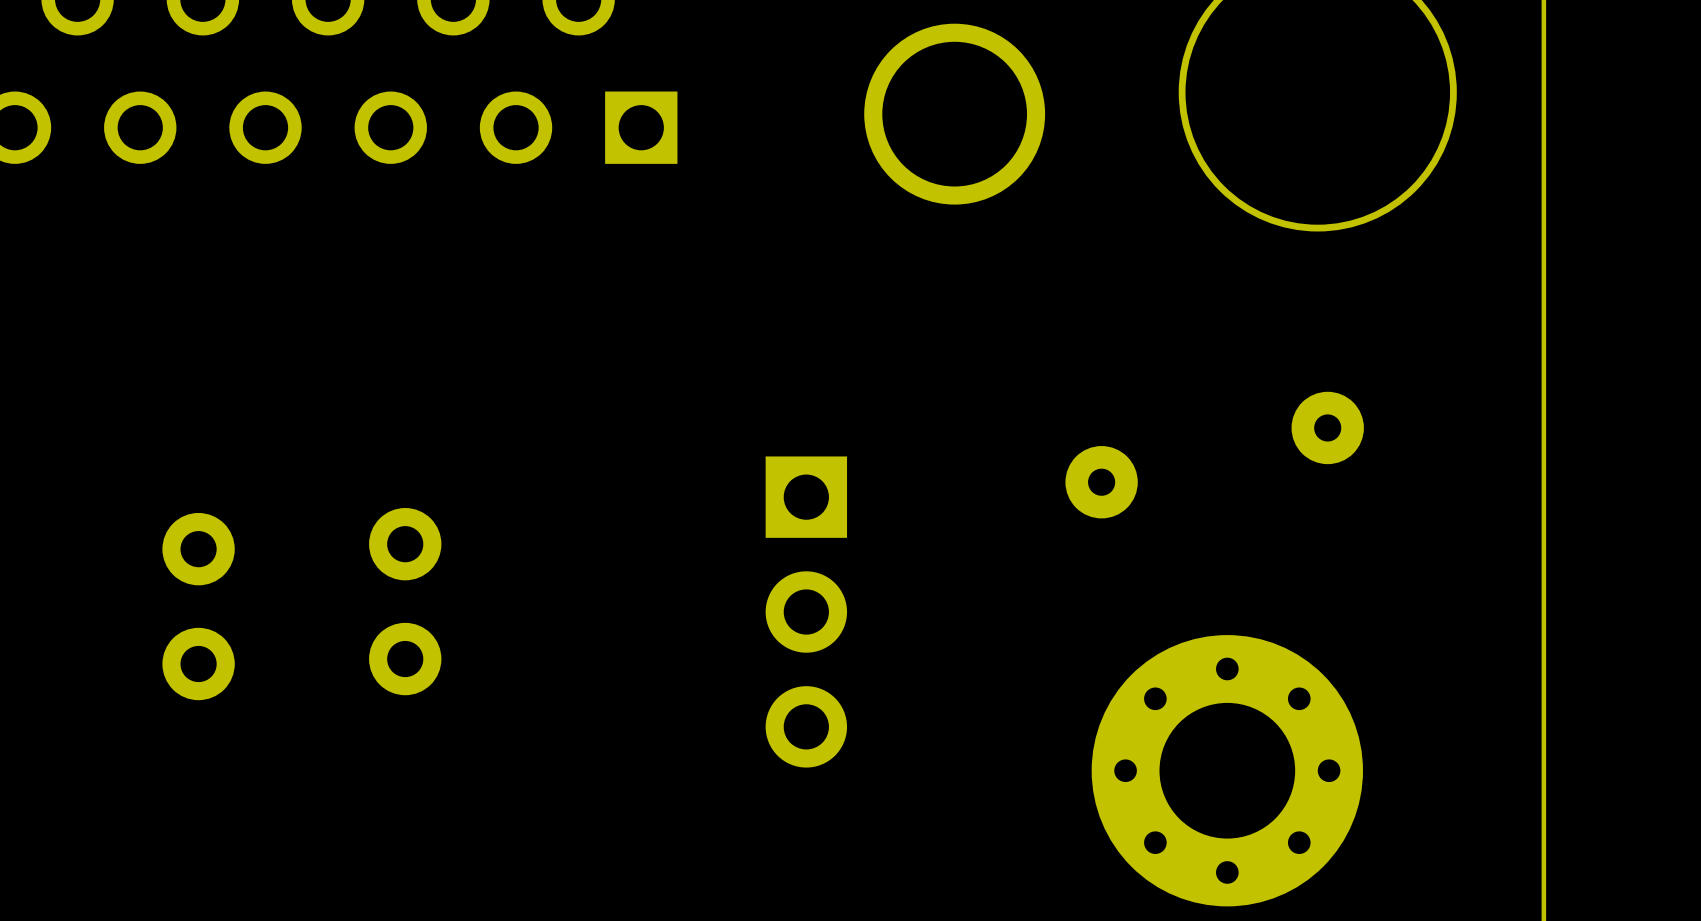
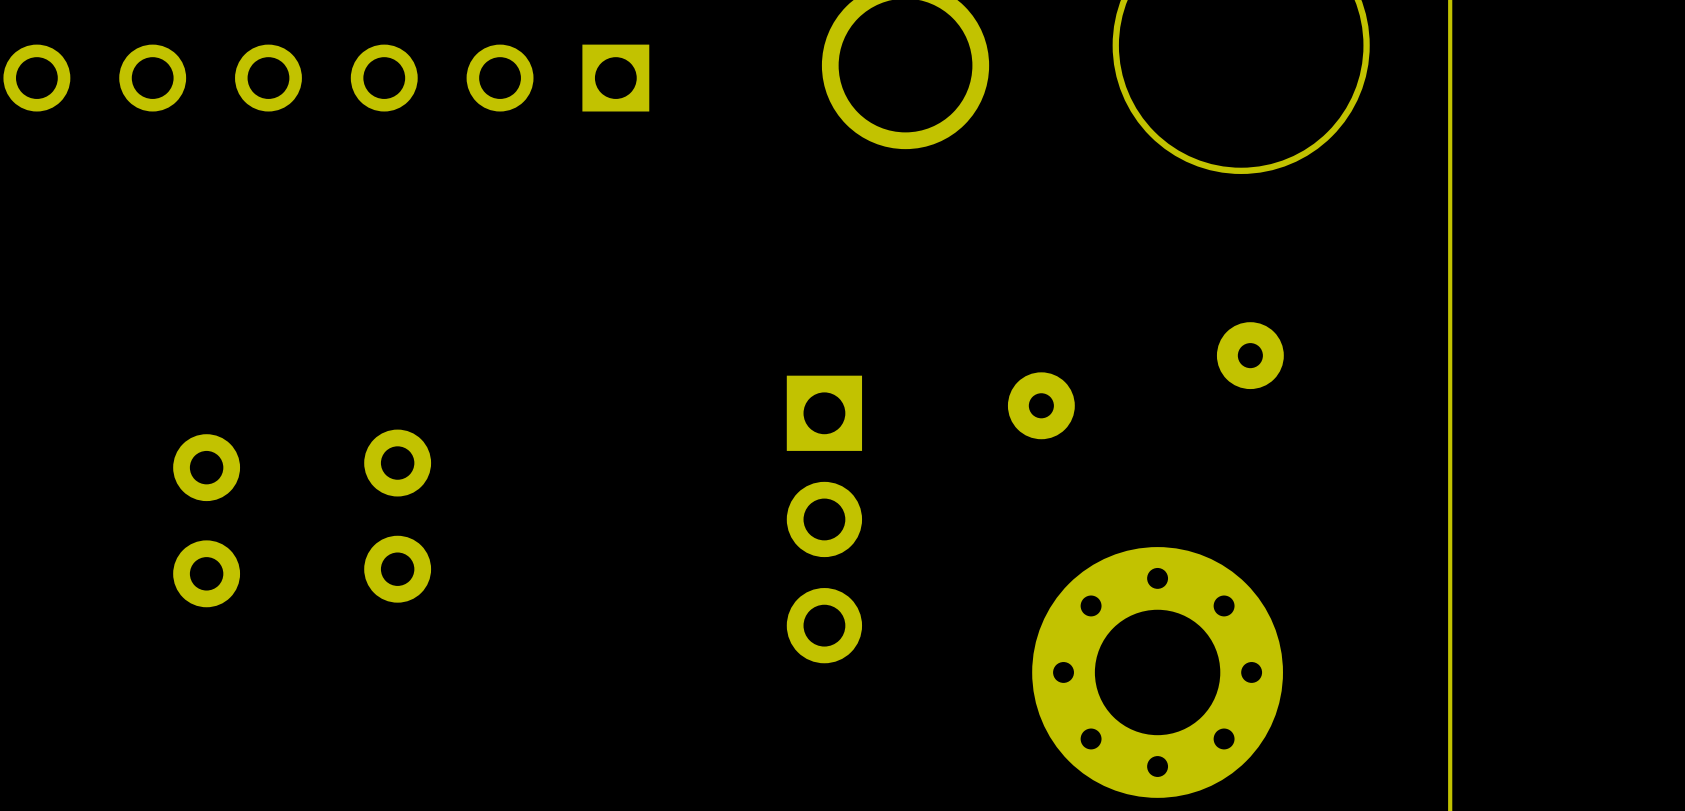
part position: (806, 612) -> (824, 519)

